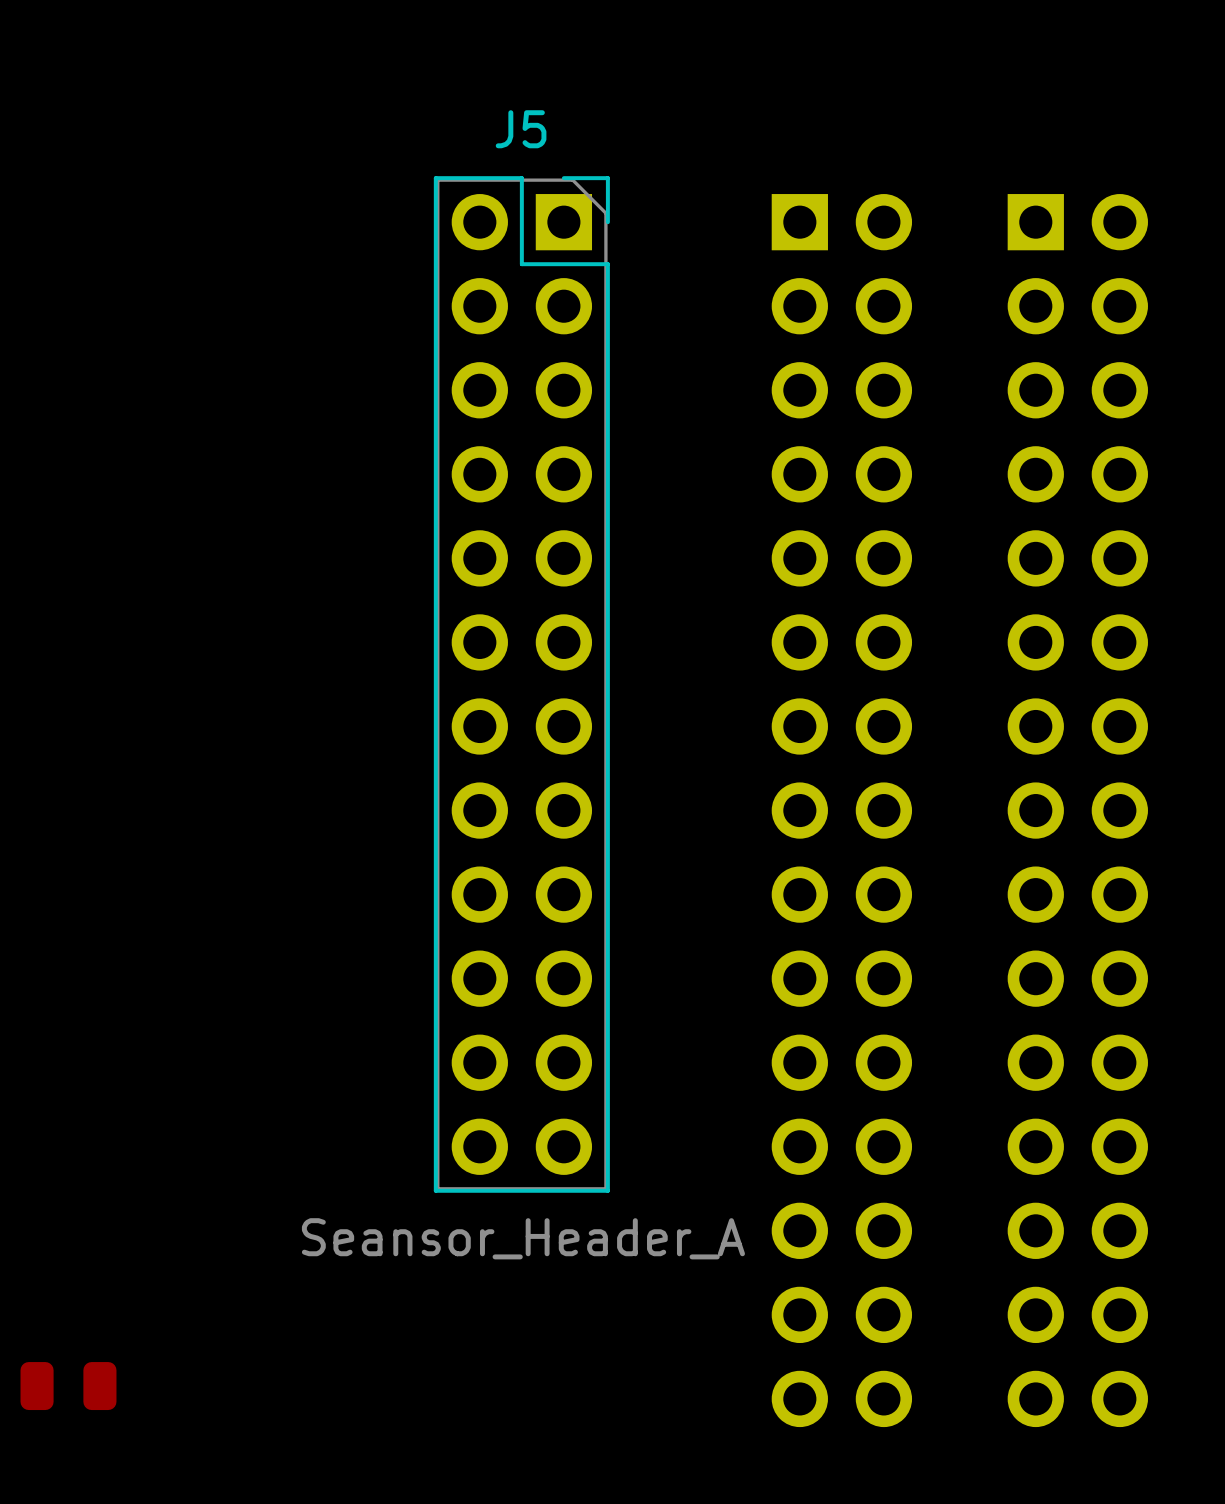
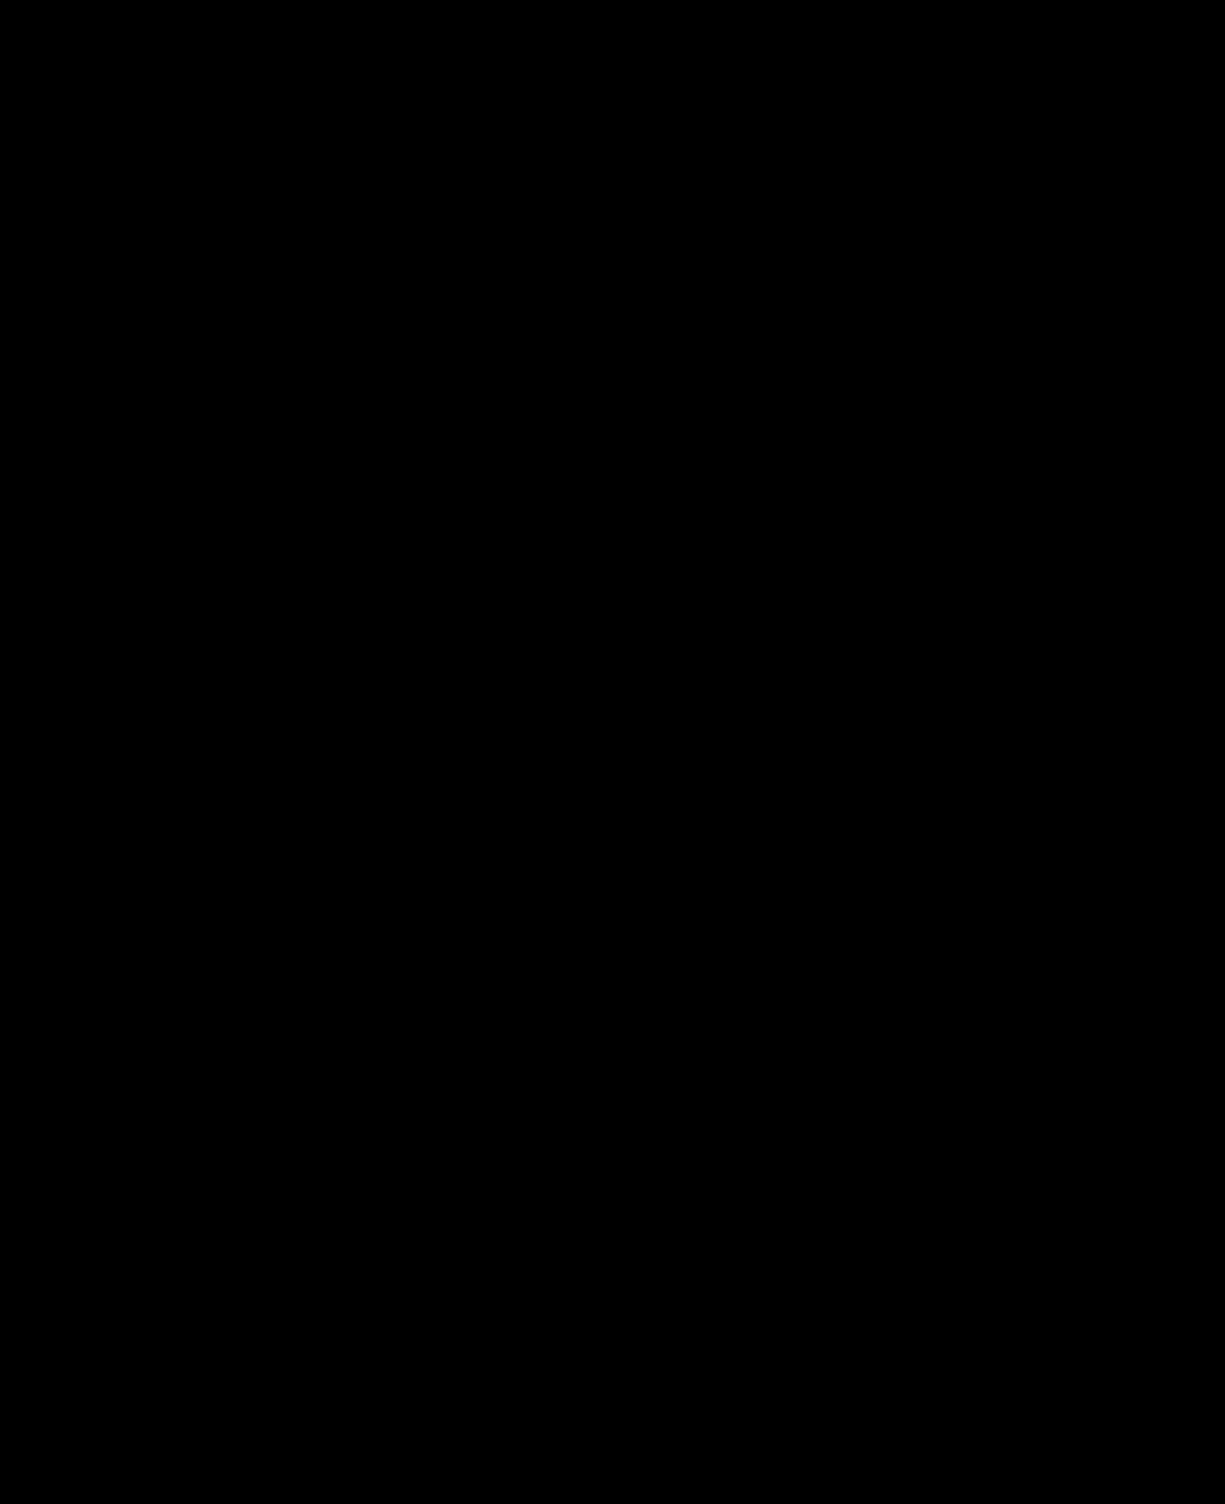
J5: Seansor_Header_A (521, 684) -> none
part: (841, 810) -> none
part: (1077, 810) -> none
part: (68, 1386) -> none

